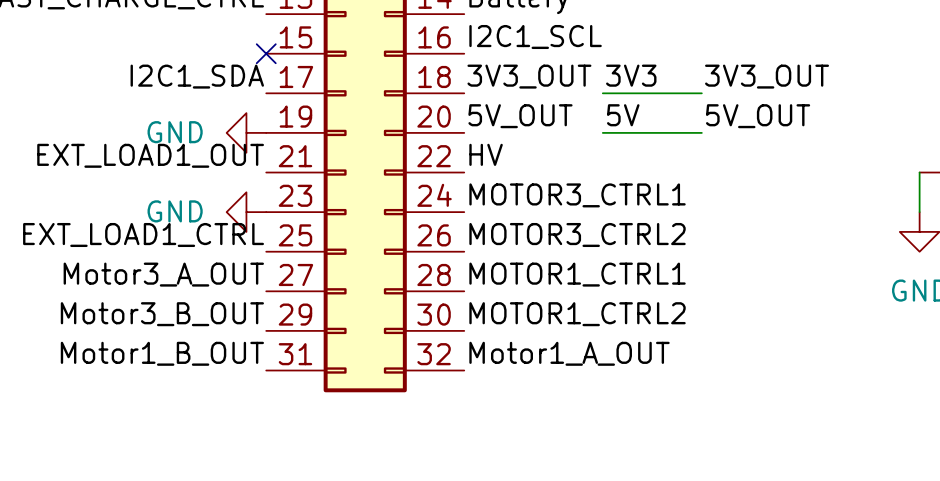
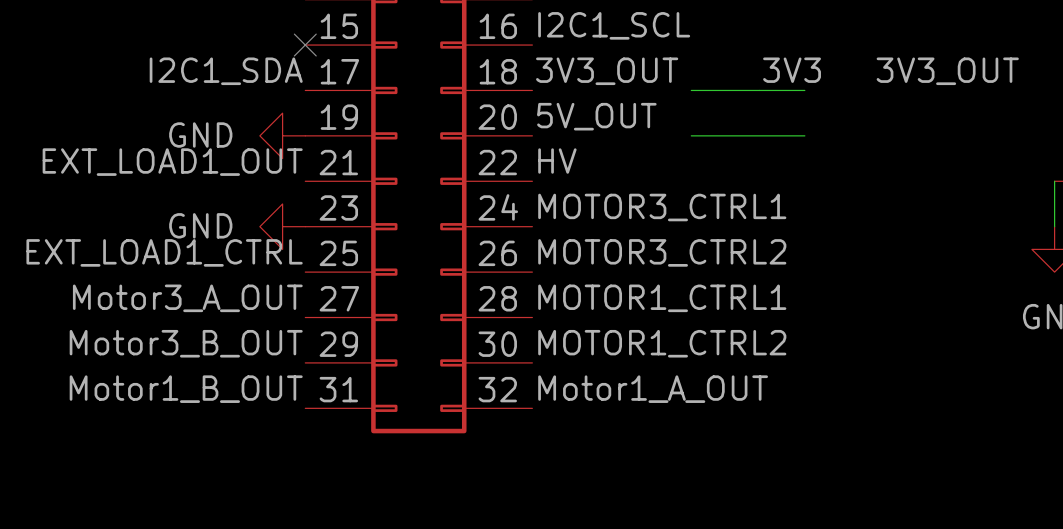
label position: 3V3 (631, 75) -> 3V3 (792, 70)
label position: 3V3_OUT (767, 76) -> 3V3_OUT (947, 71)
label: 5V (623, 115) -> none
label: 5V_OUT (758, 116) -> none

